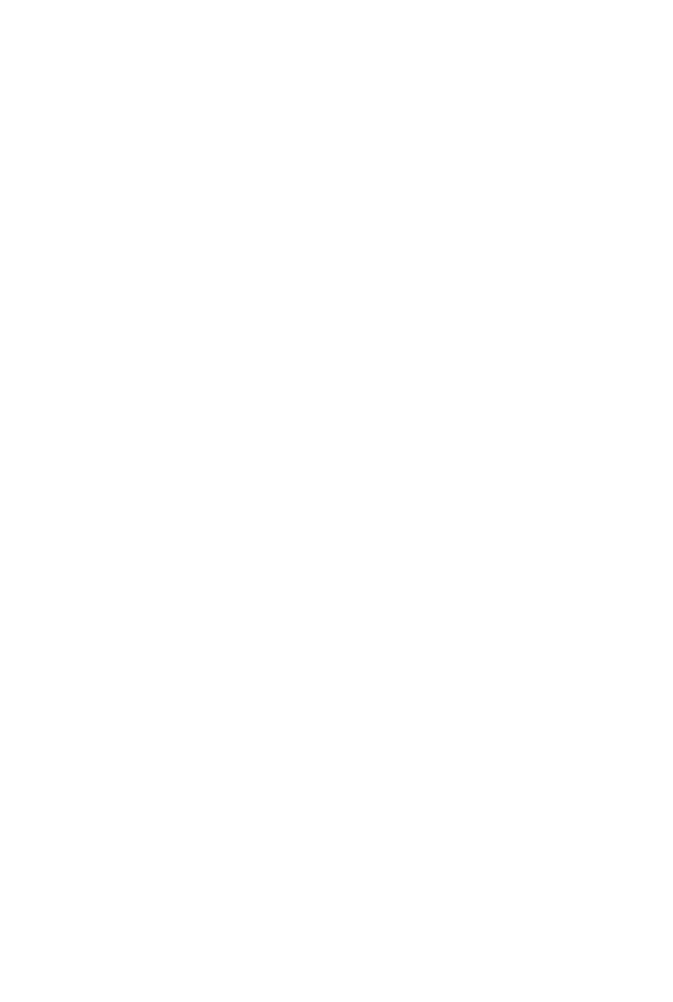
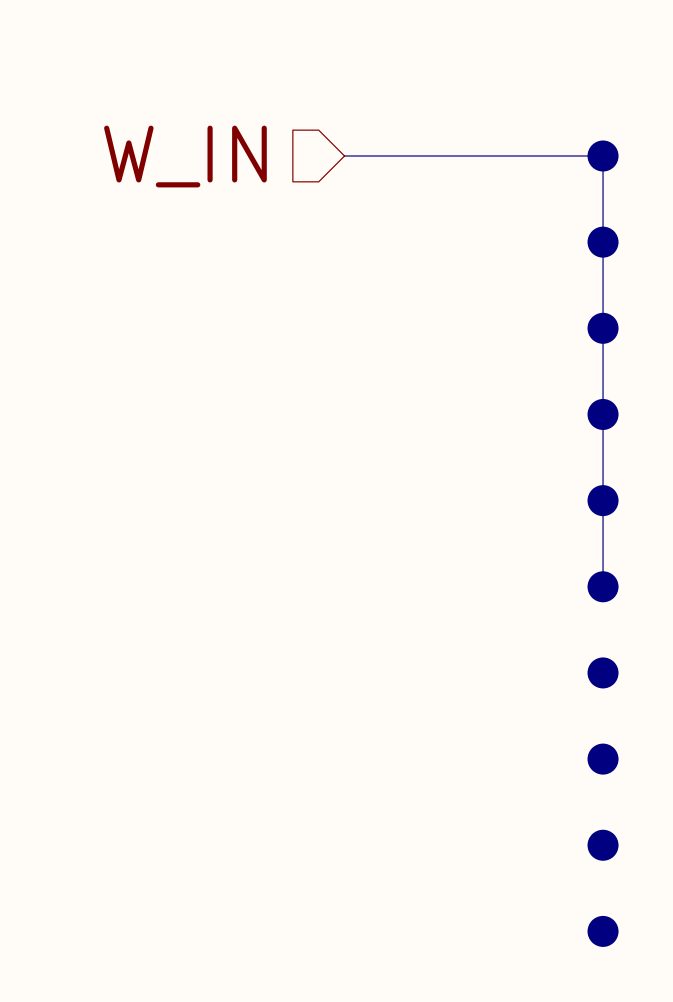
wire: none -> (344, 155) (603, 155) (603, 586)
junction: none -> (603, 155)
hierarchical label: none -> W_IN (185, 156)
junction: none -> (603, 242)
junction: none -> (603, 328)
junction: none -> (603, 414)
junction: none -> (603, 500)
junction: none -> (603, 586)
junction: none -> (603, 672)
junction: none -> (603, 759)
junction: none -> (603, 845)
junction: none -> (603, 931)

